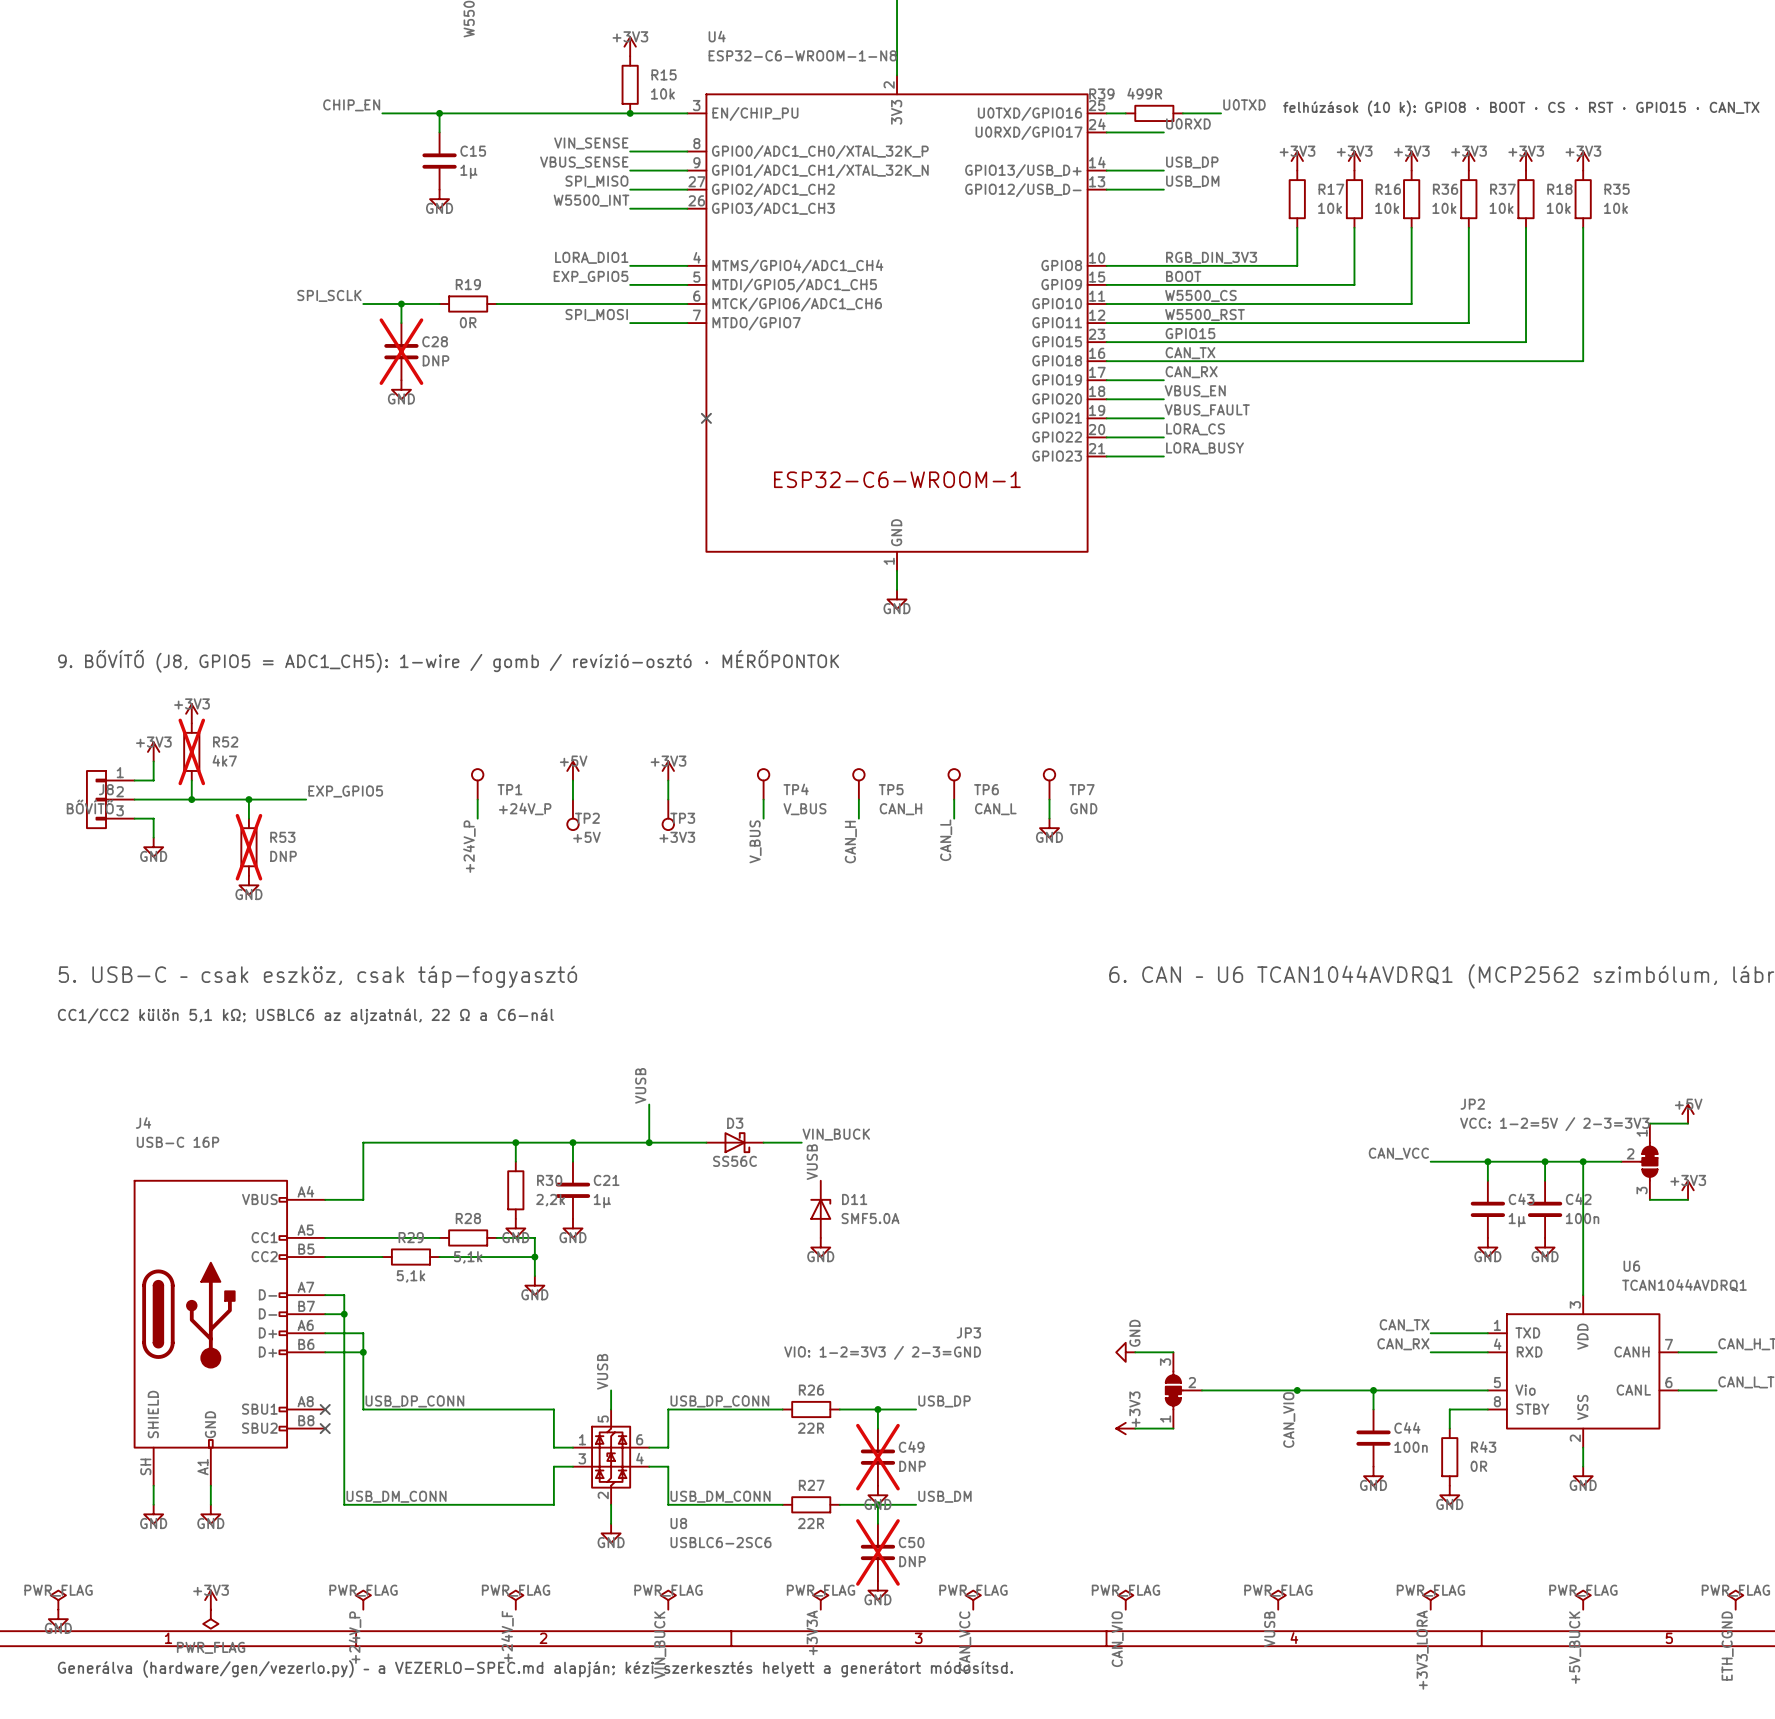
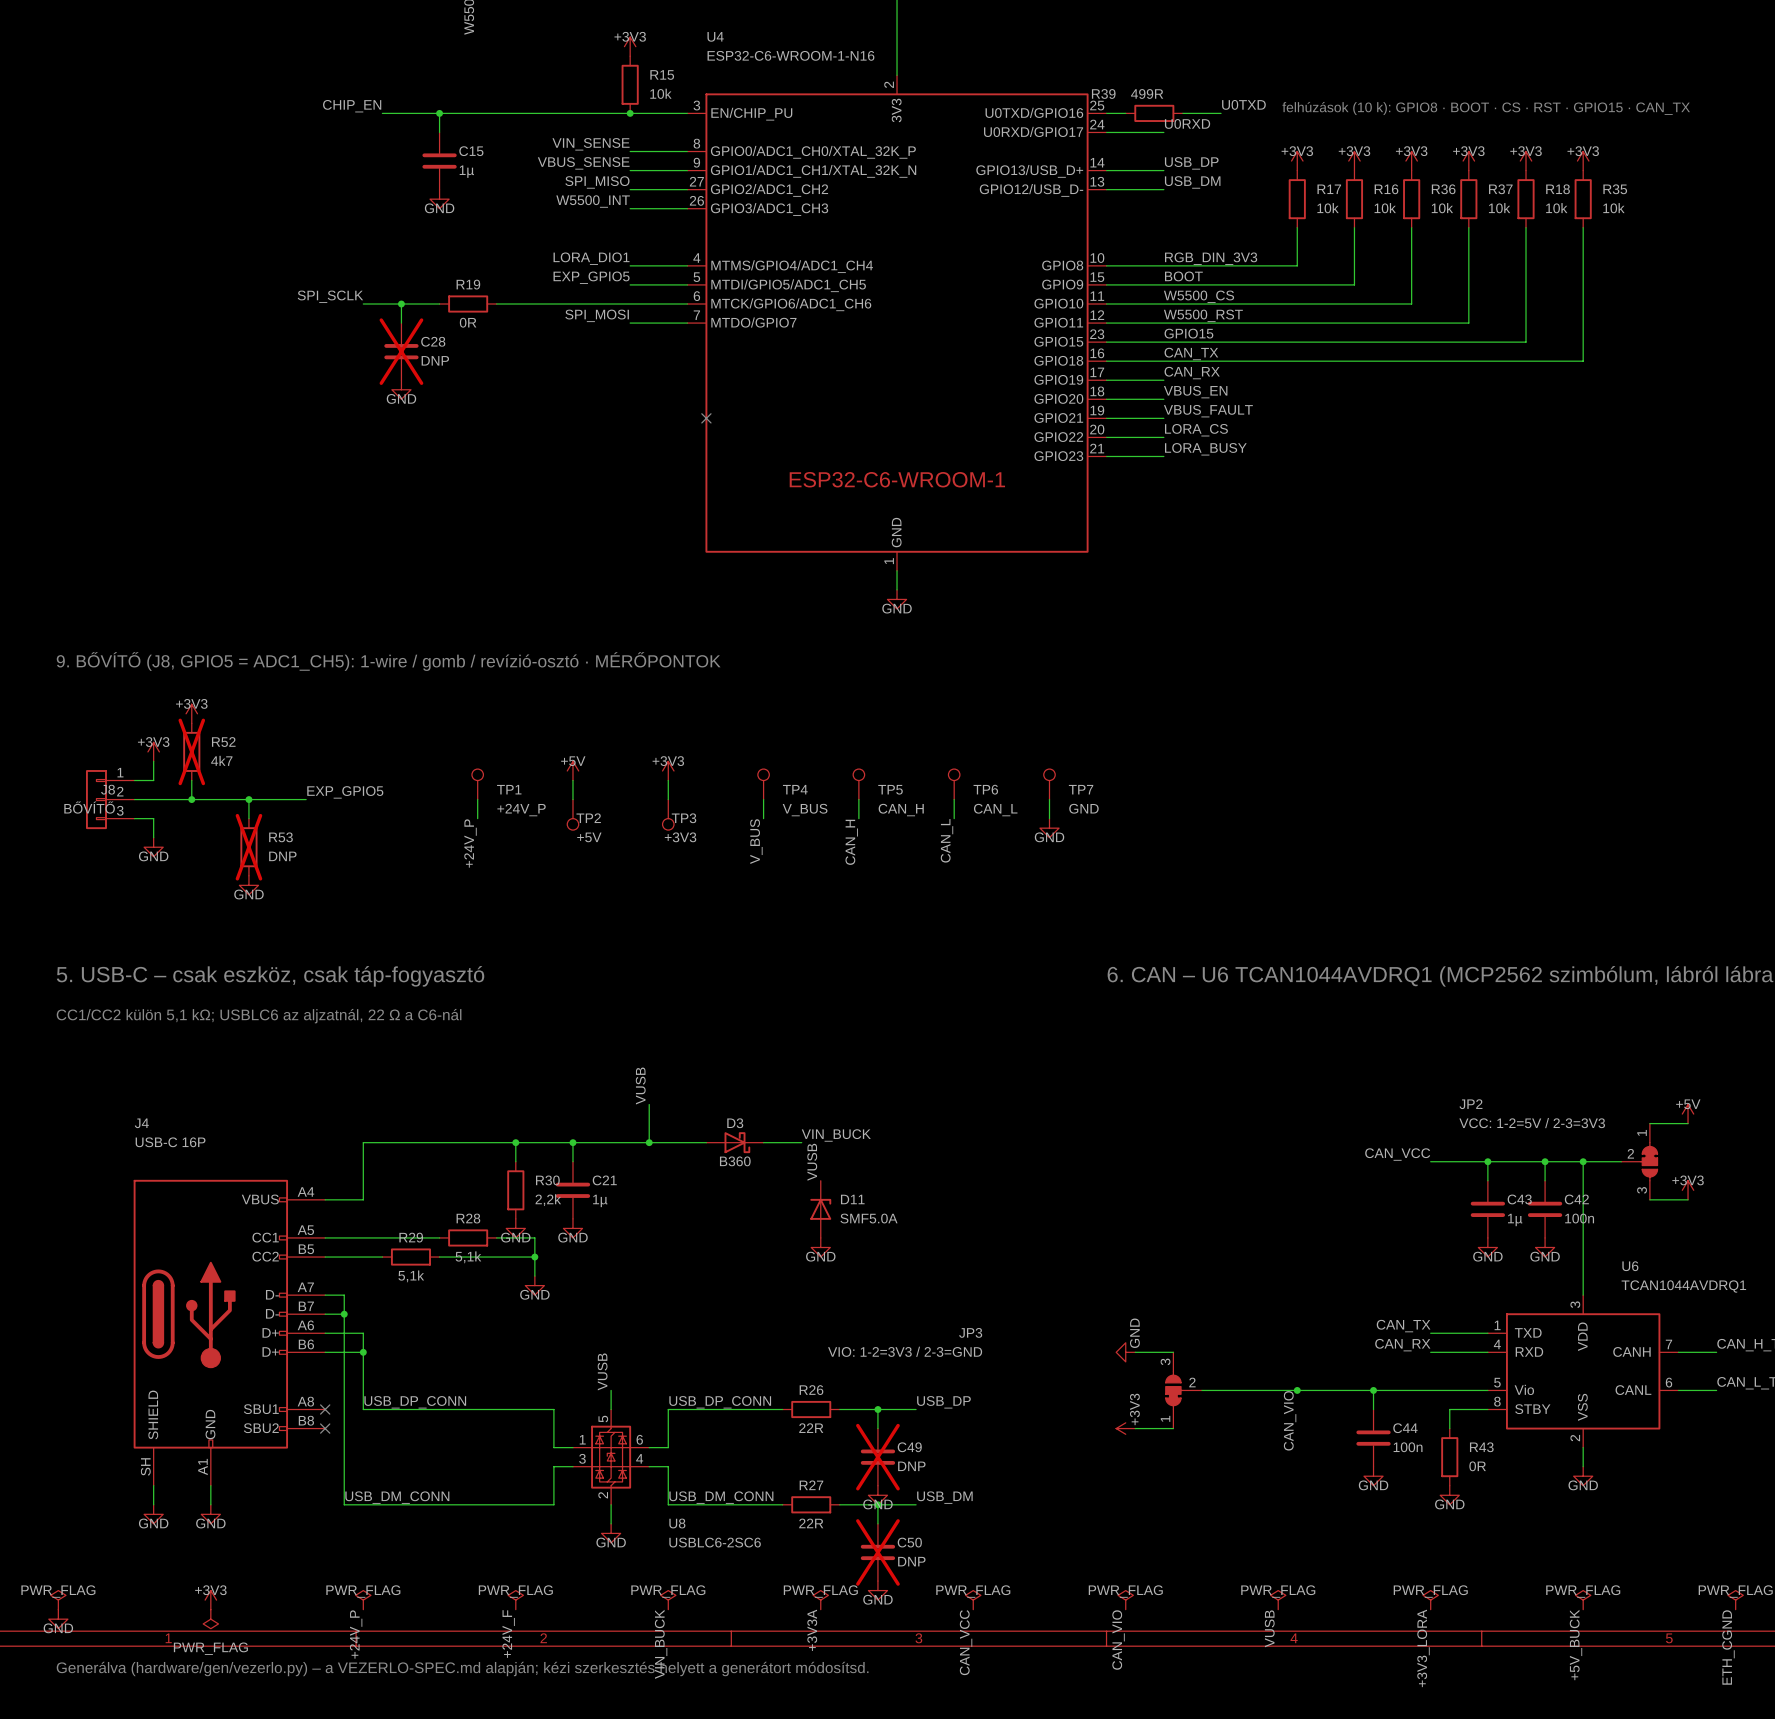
U4 value: ESP32-C6-WROOM-1-N8 (802, 55) -> ESP32-C6-WROOM-1-N16 (790, 55)
D3 value: SS56C (735, 1161) -> B360 (735, 1161)

